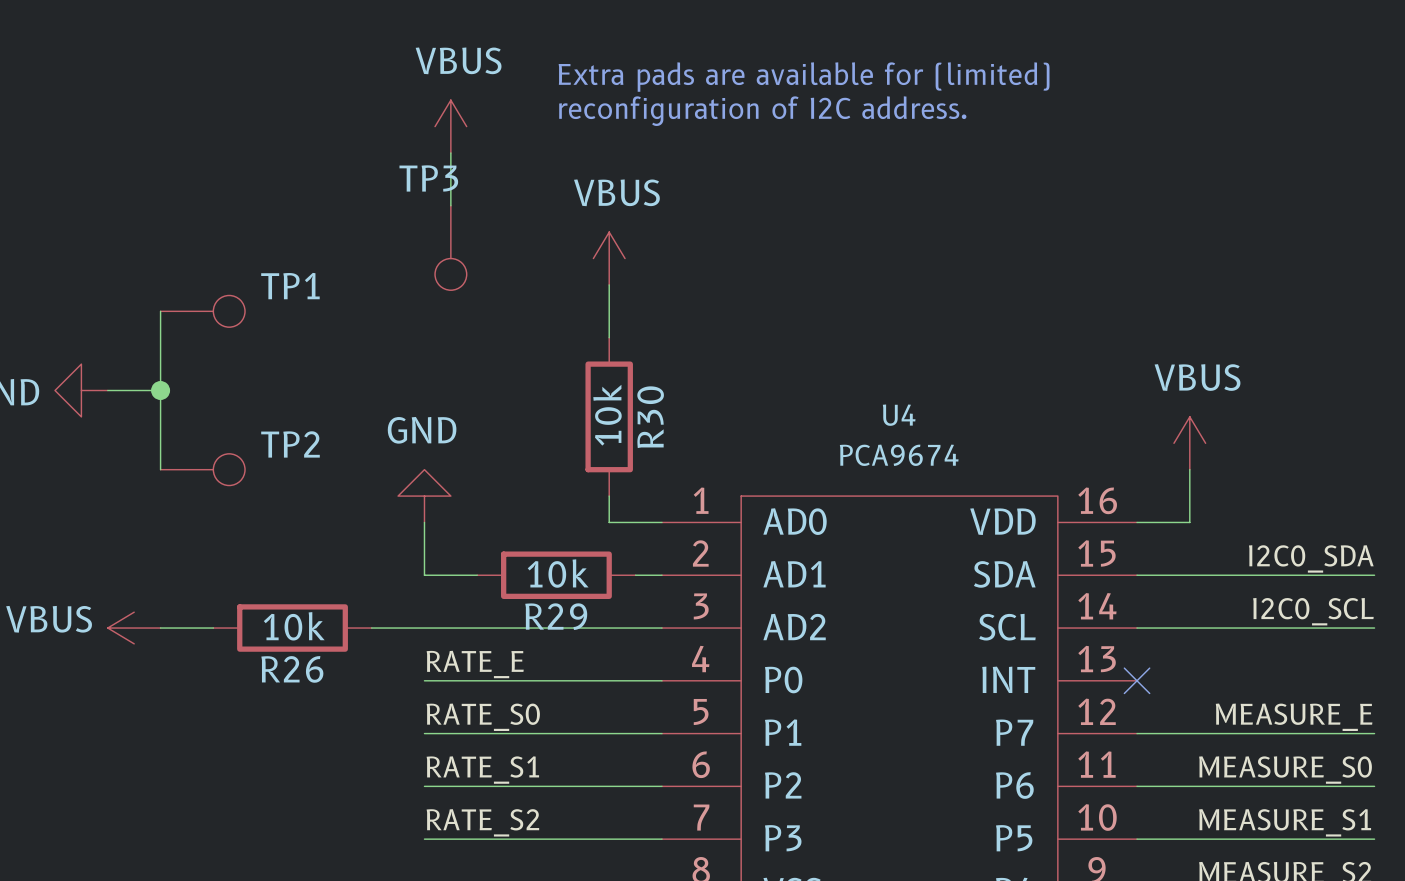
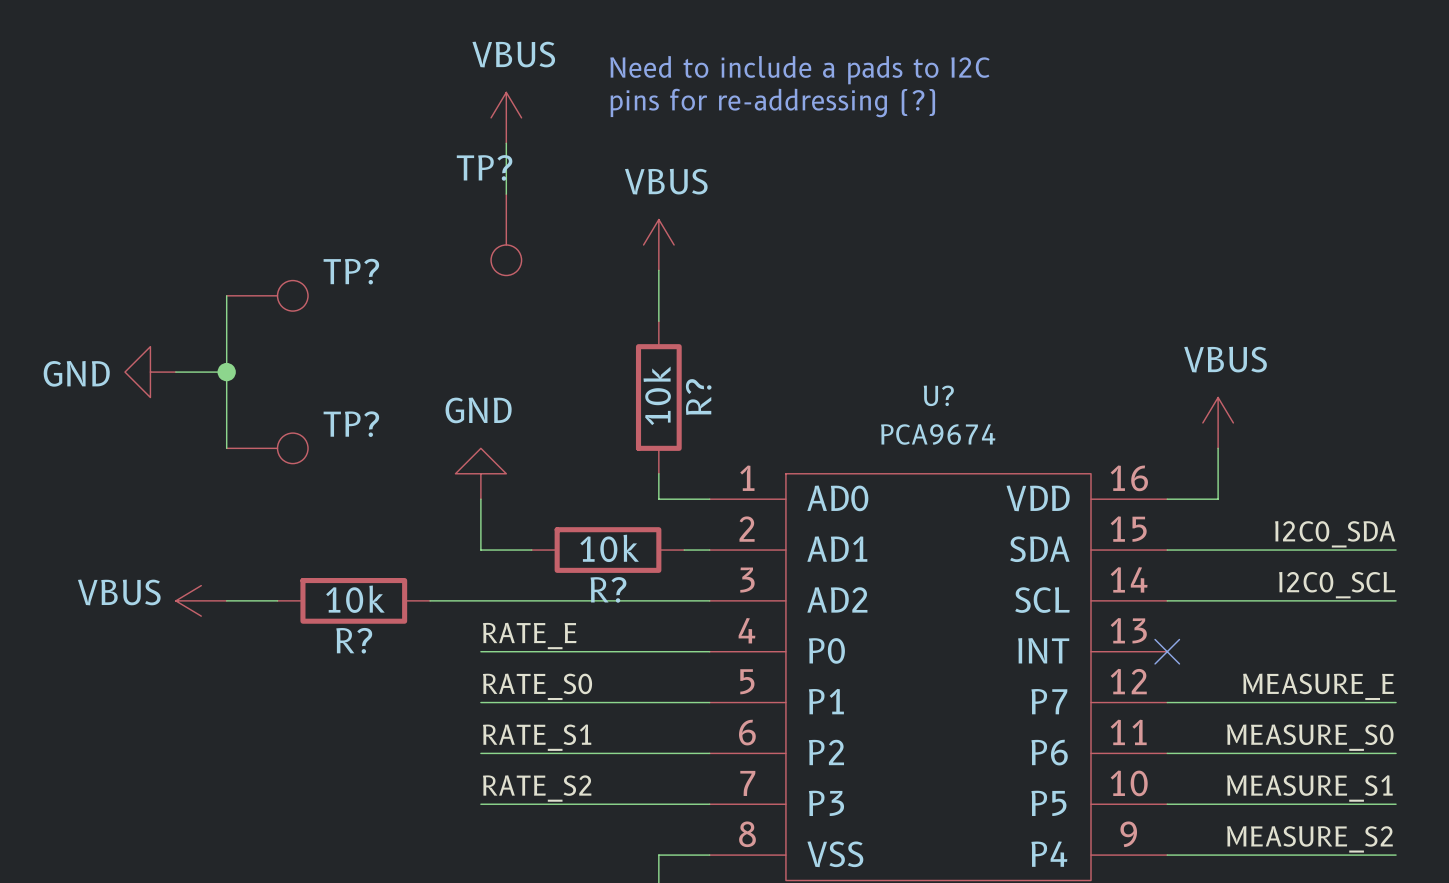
text: Extra pads are available for (limited) (804, 77) -> Need to include a pads to I2C (799, 70)
text: reconfiguration of I2C address. (762, 111) -> pins for re-addressing (?) (772, 103)
TP3 name: TP3 (428, 178) -> TP? (484, 167)
TP1 name: TP1 (290, 286) -> TP? (351, 271)
U4 name: U4 (899, 415) -> U? (938, 395)
R30 name: R30 (650, 417) -> R? (698, 397)
TP2 name: TP2 (290, 444) -> TP? (351, 424)
R29 name: R29 (556, 616) -> R? (608, 589)
R26 name: R26 (292, 669) -> R? (354, 640)

